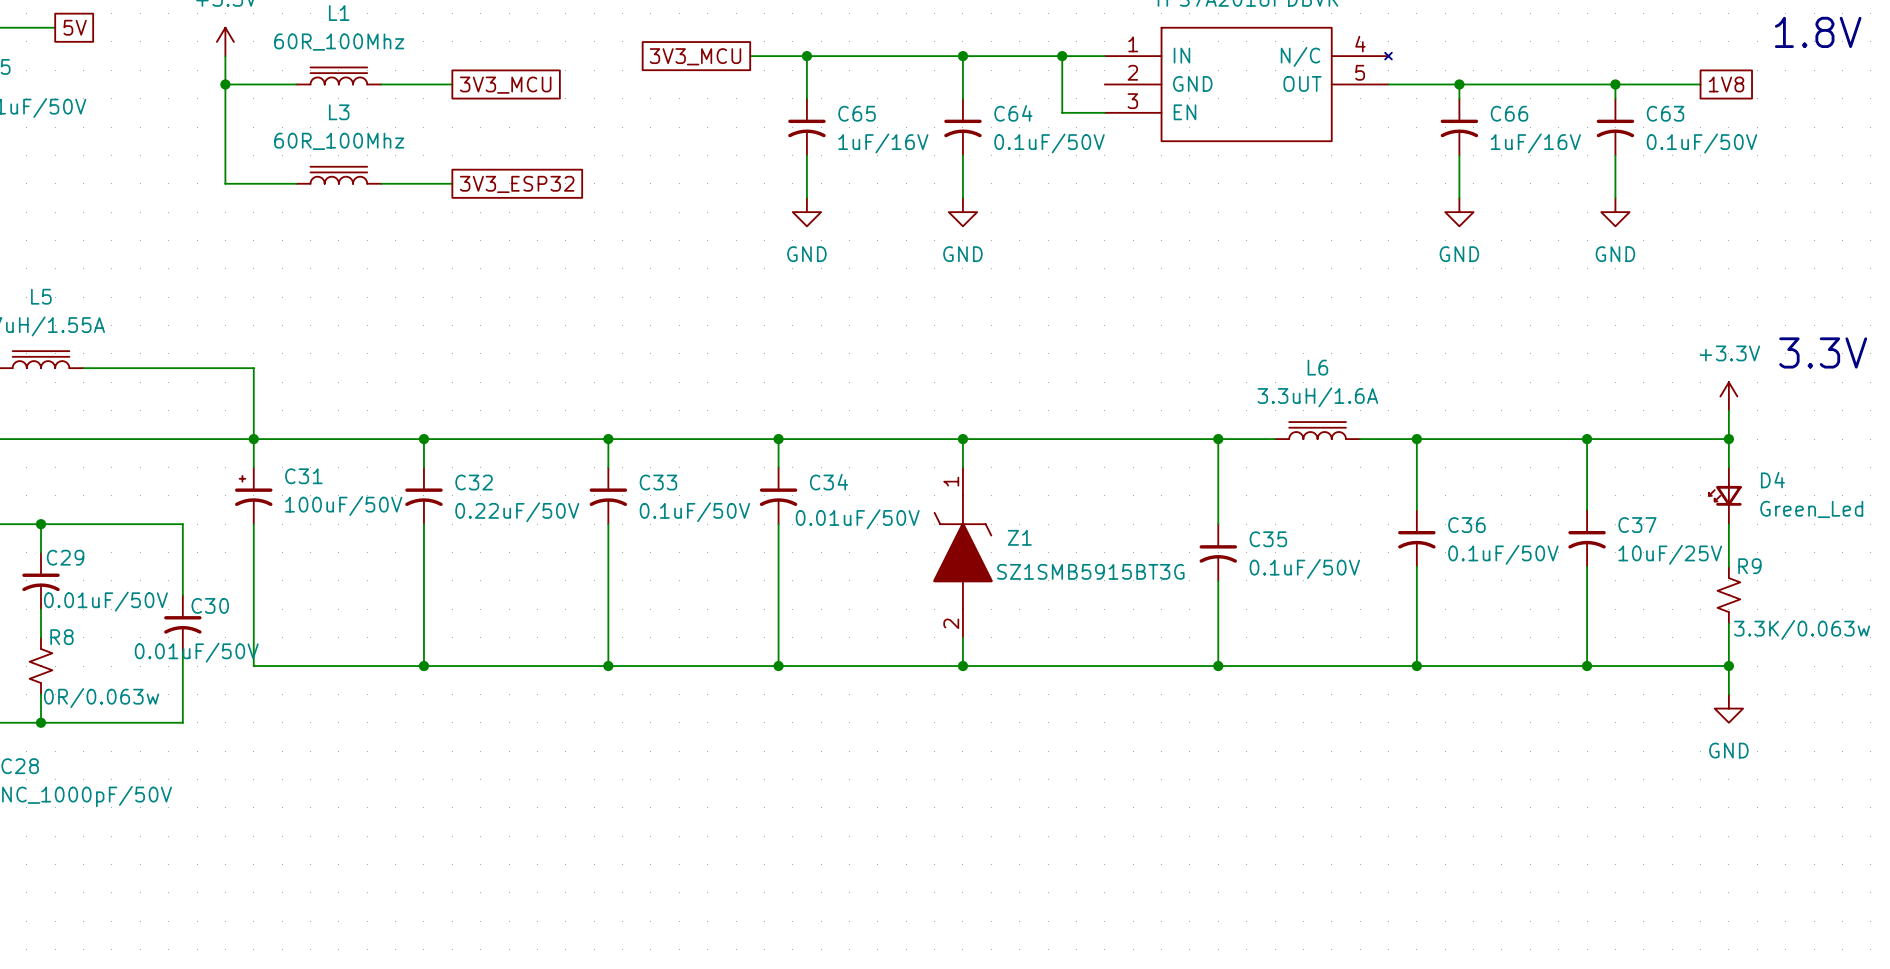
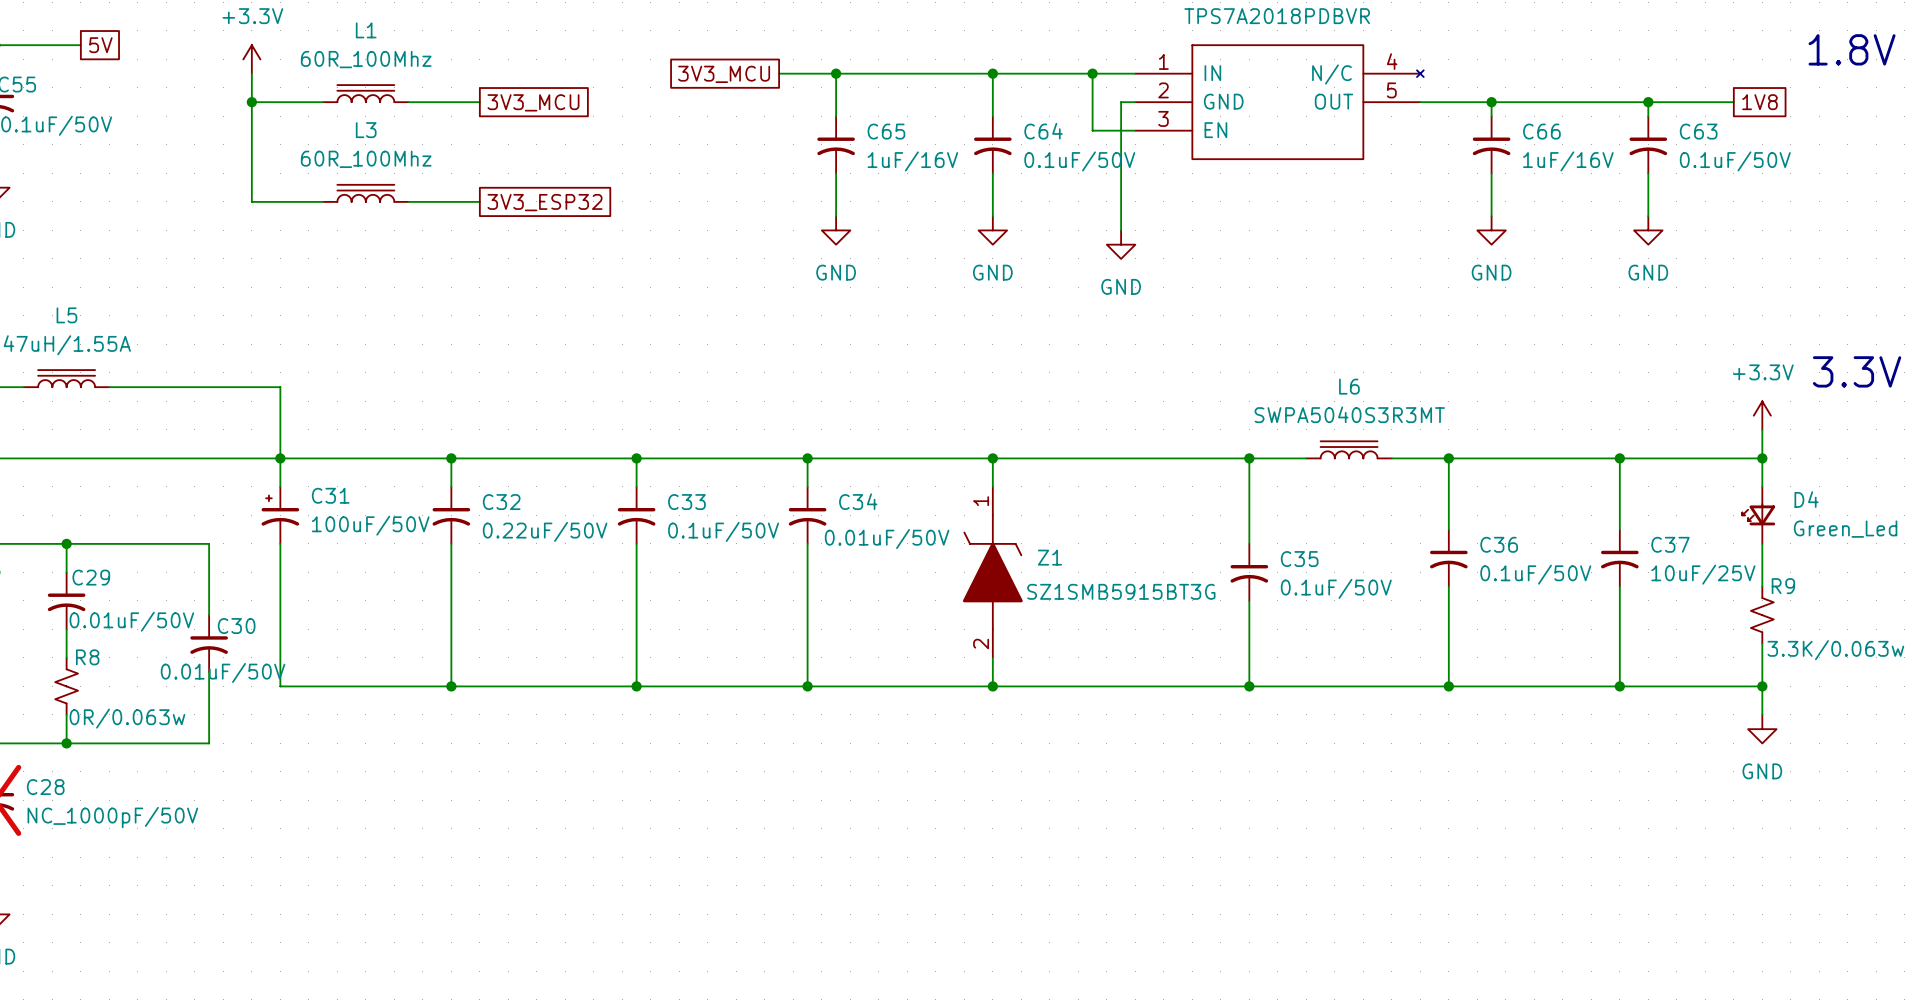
wire: none -> (1135, 102) (1121, 102) (1121, 230)
power symbol: none -> GND (1121, 244)
L6 value: 3.3uH/1.6A (1317, 397) -> SWPA5040S3R3MT (1349, 414)

